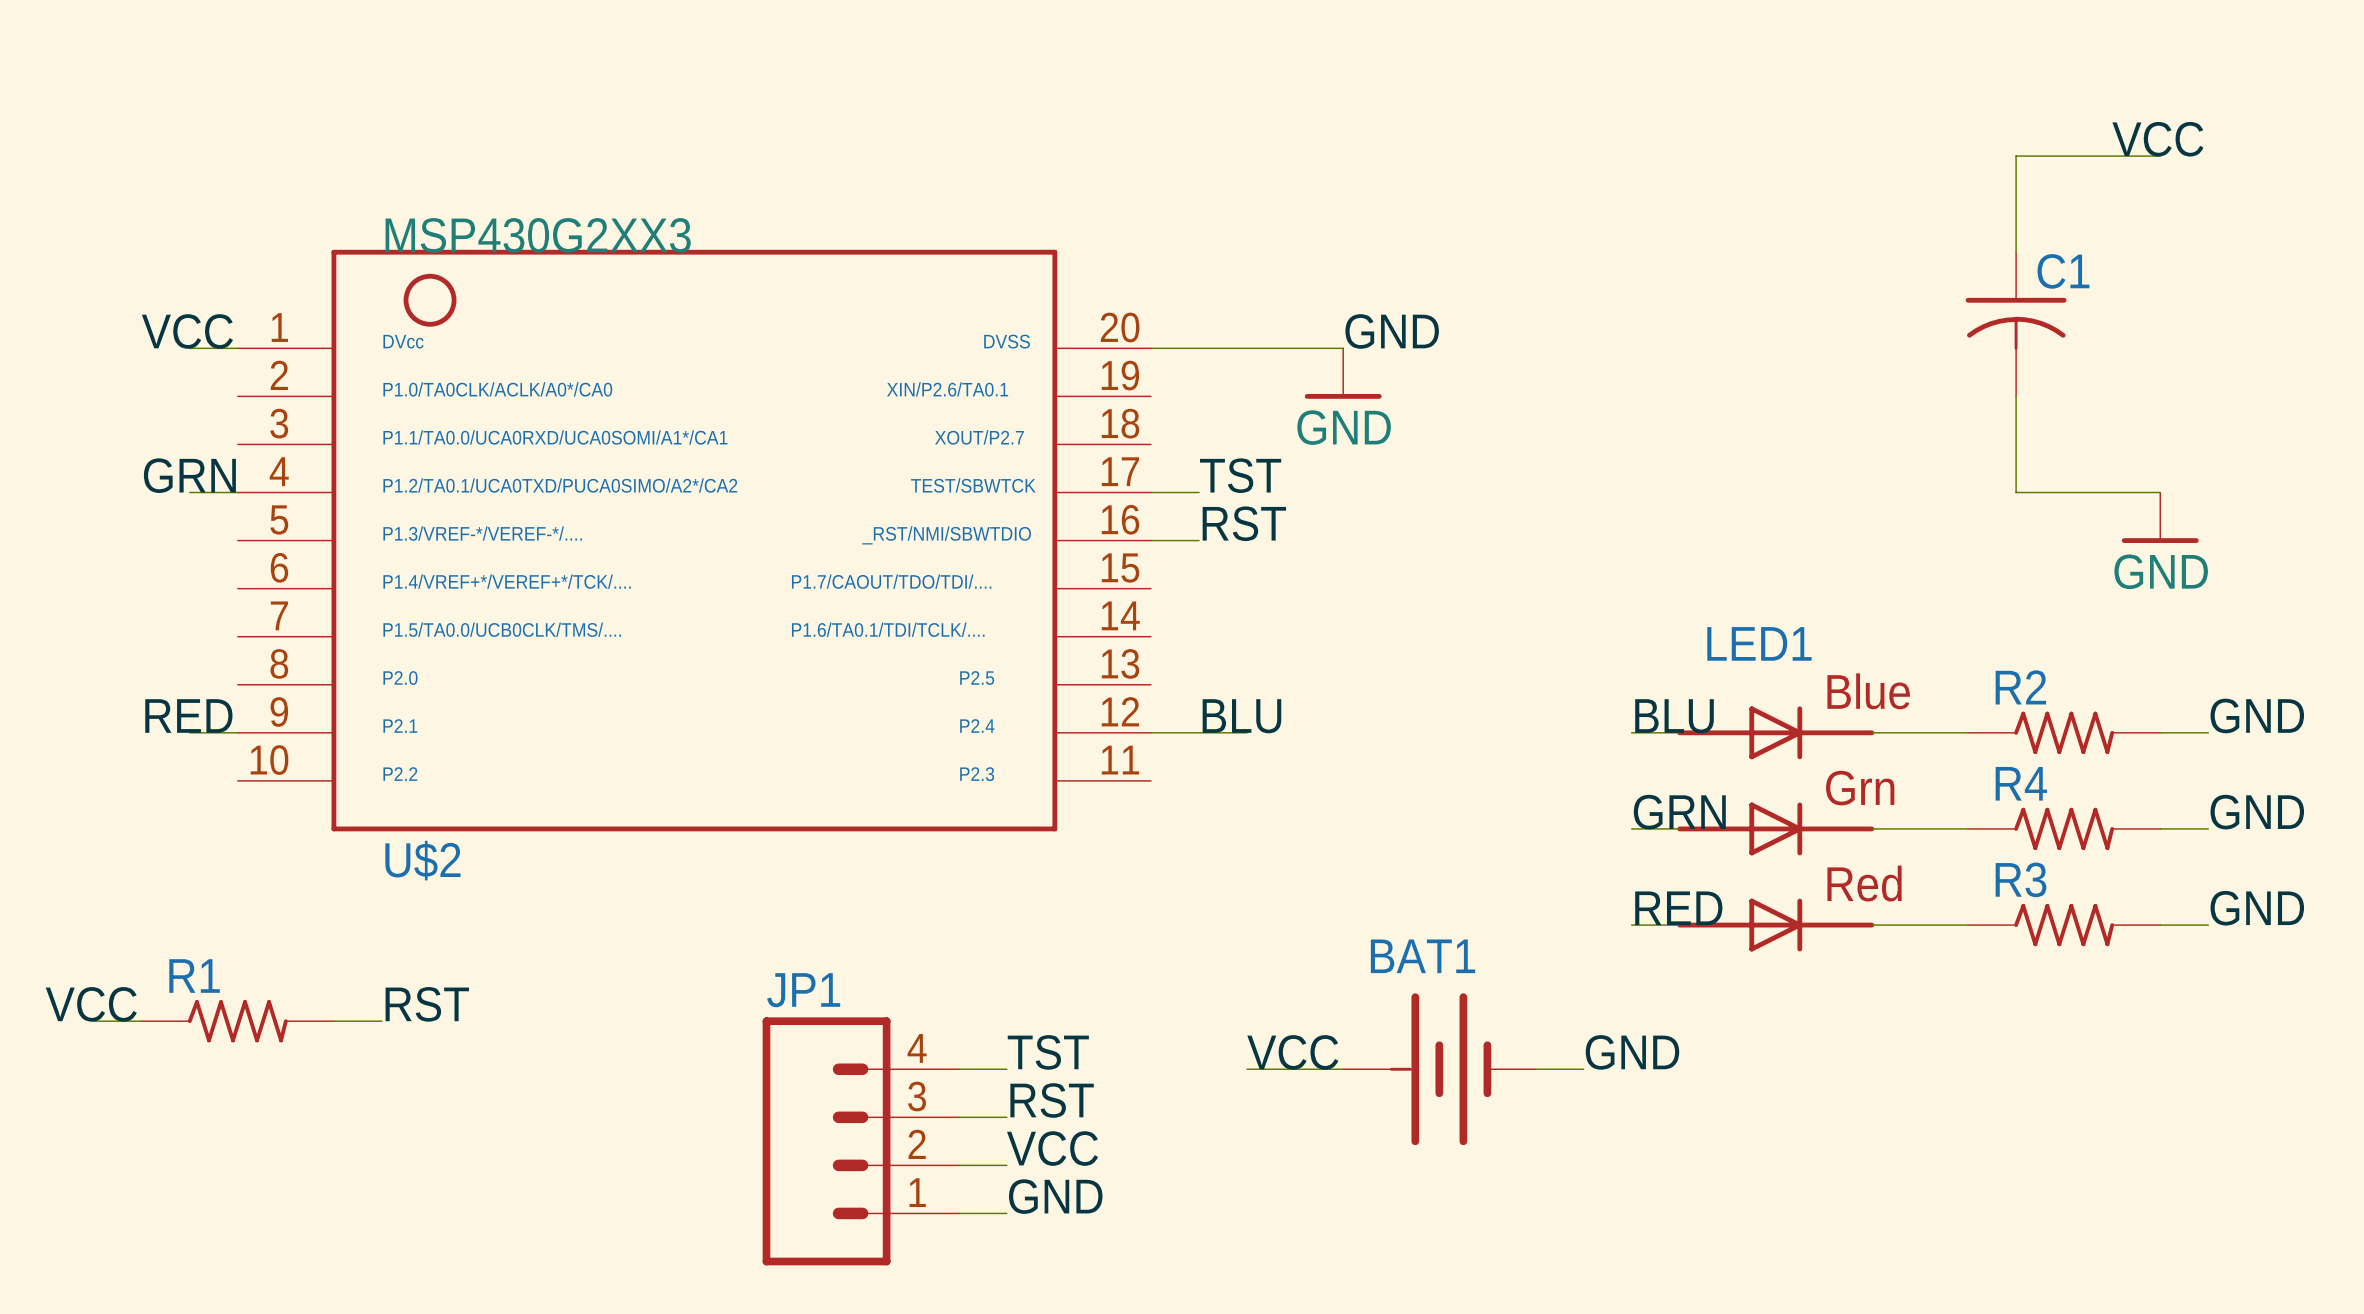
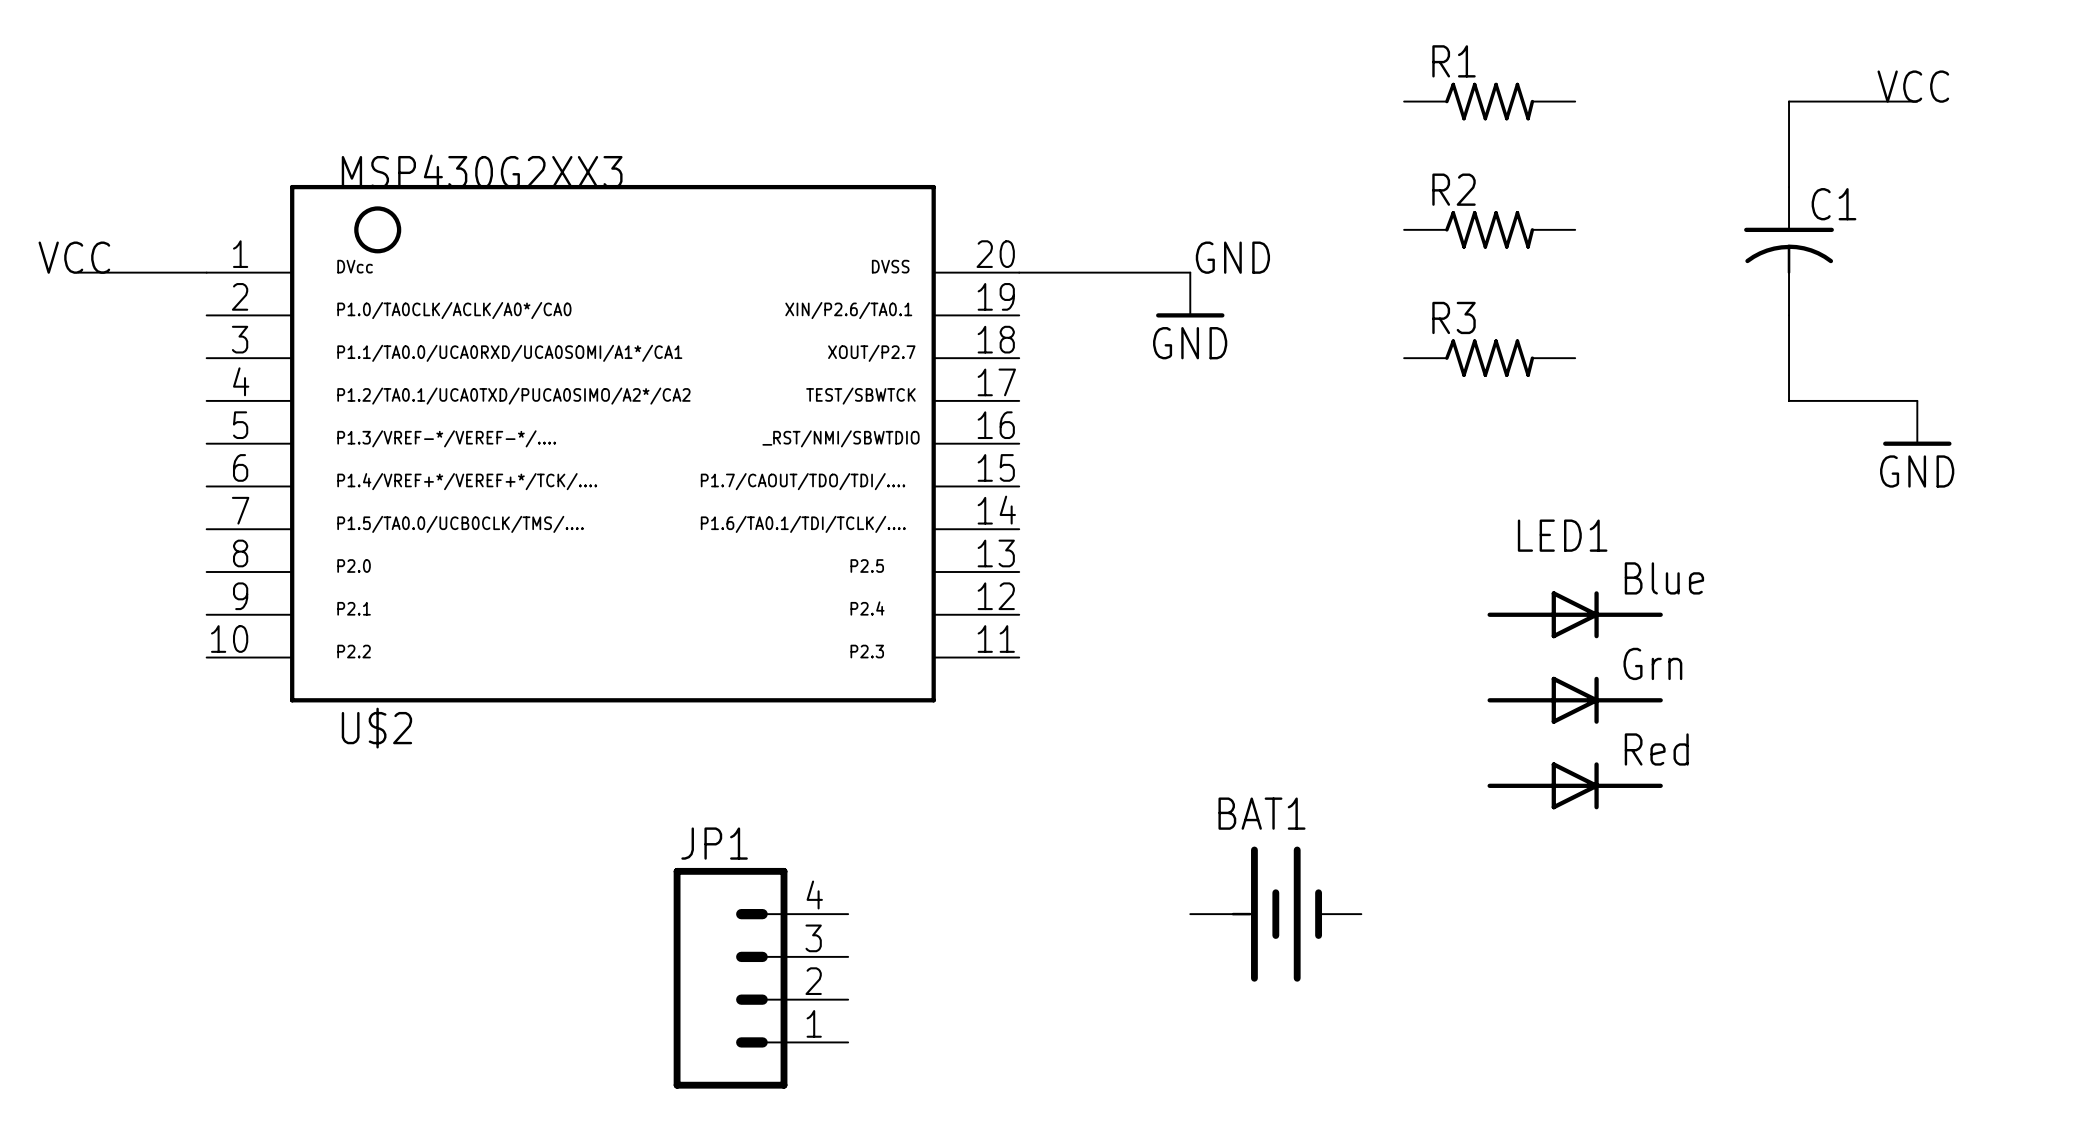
label position: VCC (187, 331) -> VCC (74, 257)
wire: none -> (78, 272) (163, 272)
label: GRN (189, 475) -> none
label: TST (1240, 475) -> none
wire: (189, 492) (237, 492) -> none
wire: (1150, 492) (1199, 492) -> none
label: RST (1244, 523) -> none
wire: (1150, 540) (1199, 540) -> none
label: GND (2257, 715) -> none
label: RED (188, 716) -> none
label: BLU (1241, 716) -> none
label: BLU (1674, 716) -> none
wire: (189, 732) (237, 732) -> none
wire: (1150, 732) (1247, 732) -> none
wire: (1631, 732) (1679, 732) -> none
wire: (1871, 732) (1968, 732) -> none
R2 position: (2064, 732) -> (1489, 229)
wire: (2160, 732) (2208, 732) -> none
label: GRN (1679, 812) -> none
label: GND (2257, 812) -> none
wire: (1631, 828) (1679, 828) -> none
wire: (1871, 828) (1968, 828) -> none
R4: (2064, 828) -> none
wire: (2160, 828) (2208, 828) -> none
label: RED (1678, 908) -> none
label: GND (2257, 908) -> none
wire: (1631, 925) (1679, 925) -> none
wire: (1871, 925) (1968, 925) -> none
R3 position: (2064, 925) -> (1489, 358)
wire: (2160, 925) (2208, 925) -> none
label: VCC (91, 1004) -> none
label: RST (427, 1004) -> none
wire: (93, 1021) (141, 1021) -> none
R1 position: (237, 1021) -> (1489, 101)
wire: (333, 1021) (381, 1021) -> none
label: TST (1048, 1052) -> none
label: VCC (1292, 1052) -> none
label: GND (1632, 1052) -> none
wire: (958, 1069) (1006, 1069) -> none
wire: (1247, 1069) (1343, 1069) -> none
wire: (1535, 1069) (1583, 1069) -> none
label: RST (1052, 1100) -> none
wire: (958, 1117) (1006, 1117) -> none
label: VCC (1052, 1148) -> none
wire: (958, 1165) (1006, 1165) -> none
label: GND (1055, 1196) -> none
wire: (958, 1213) (1006, 1213) -> none

